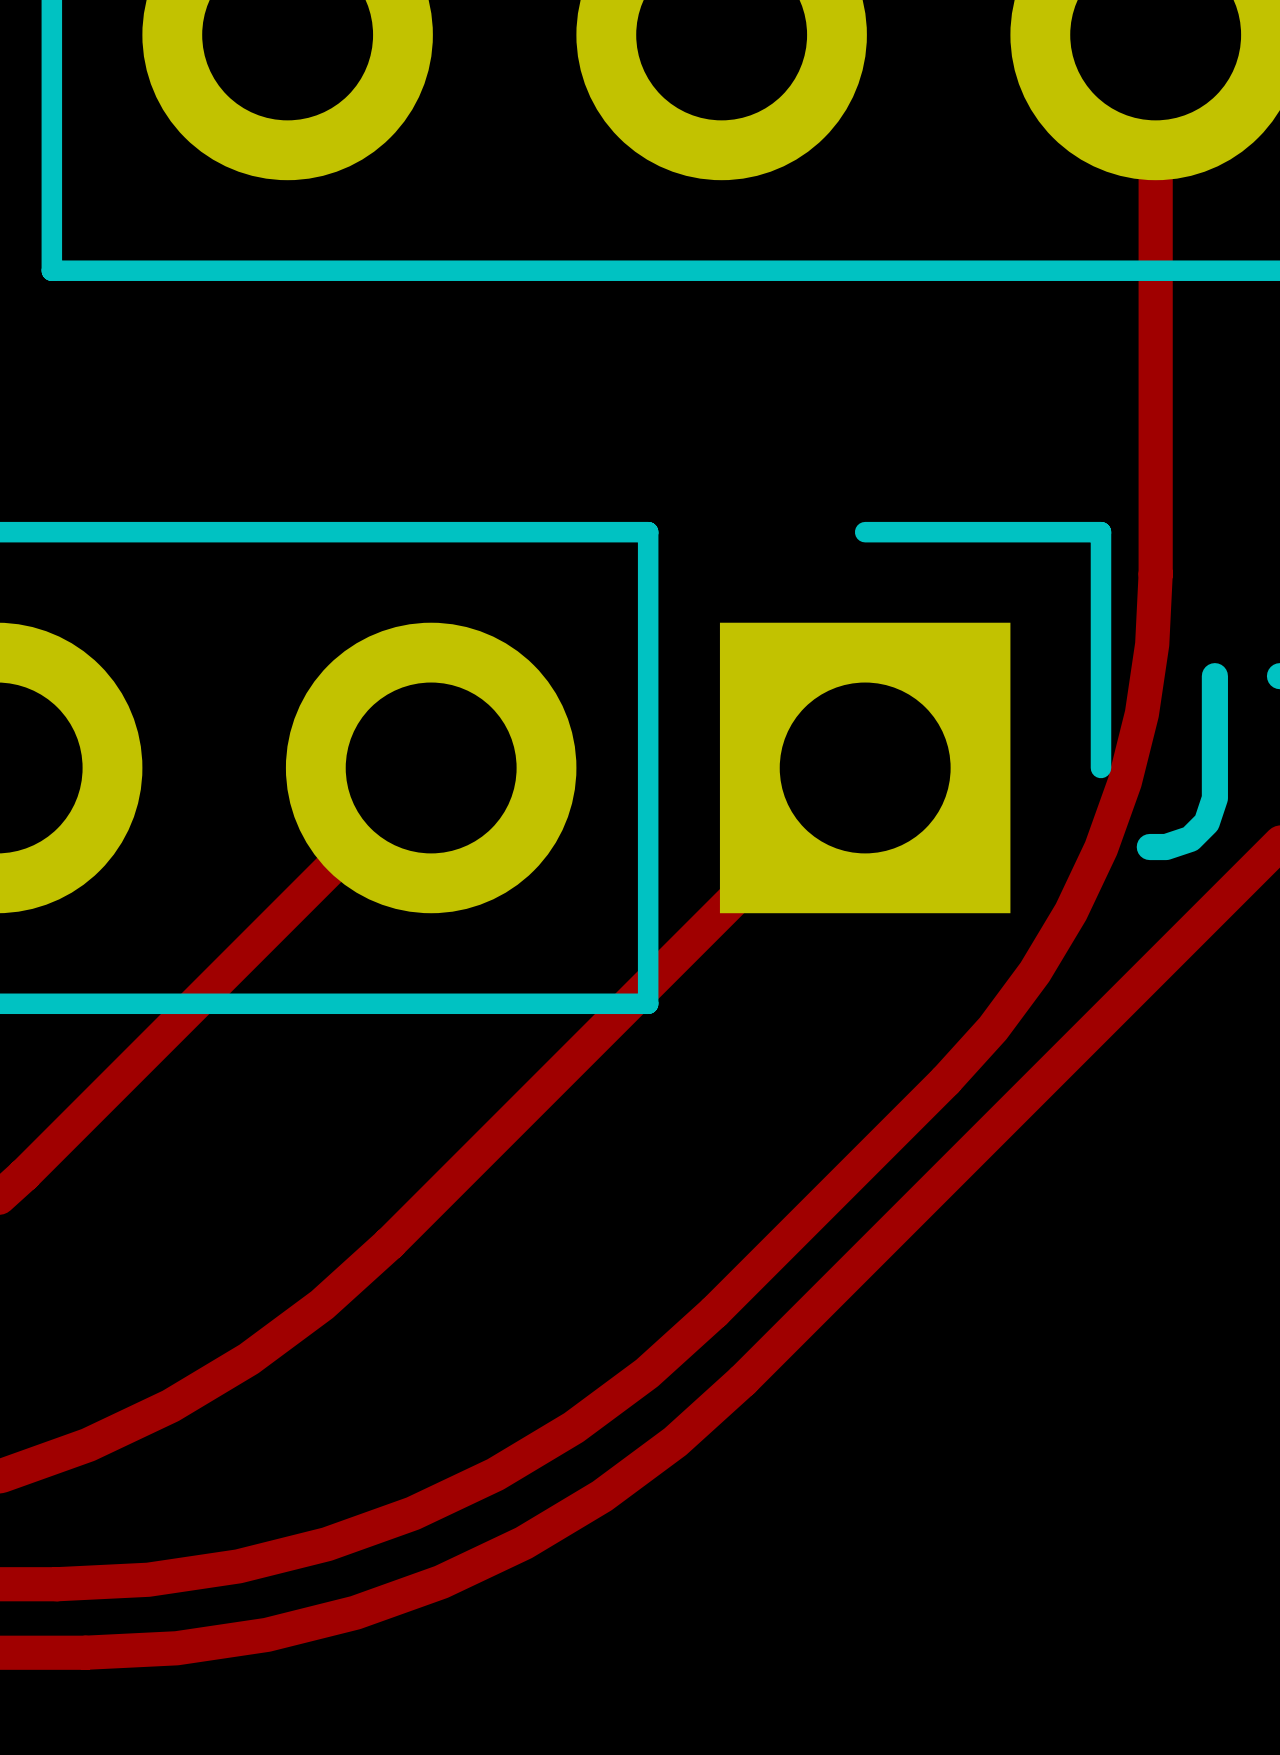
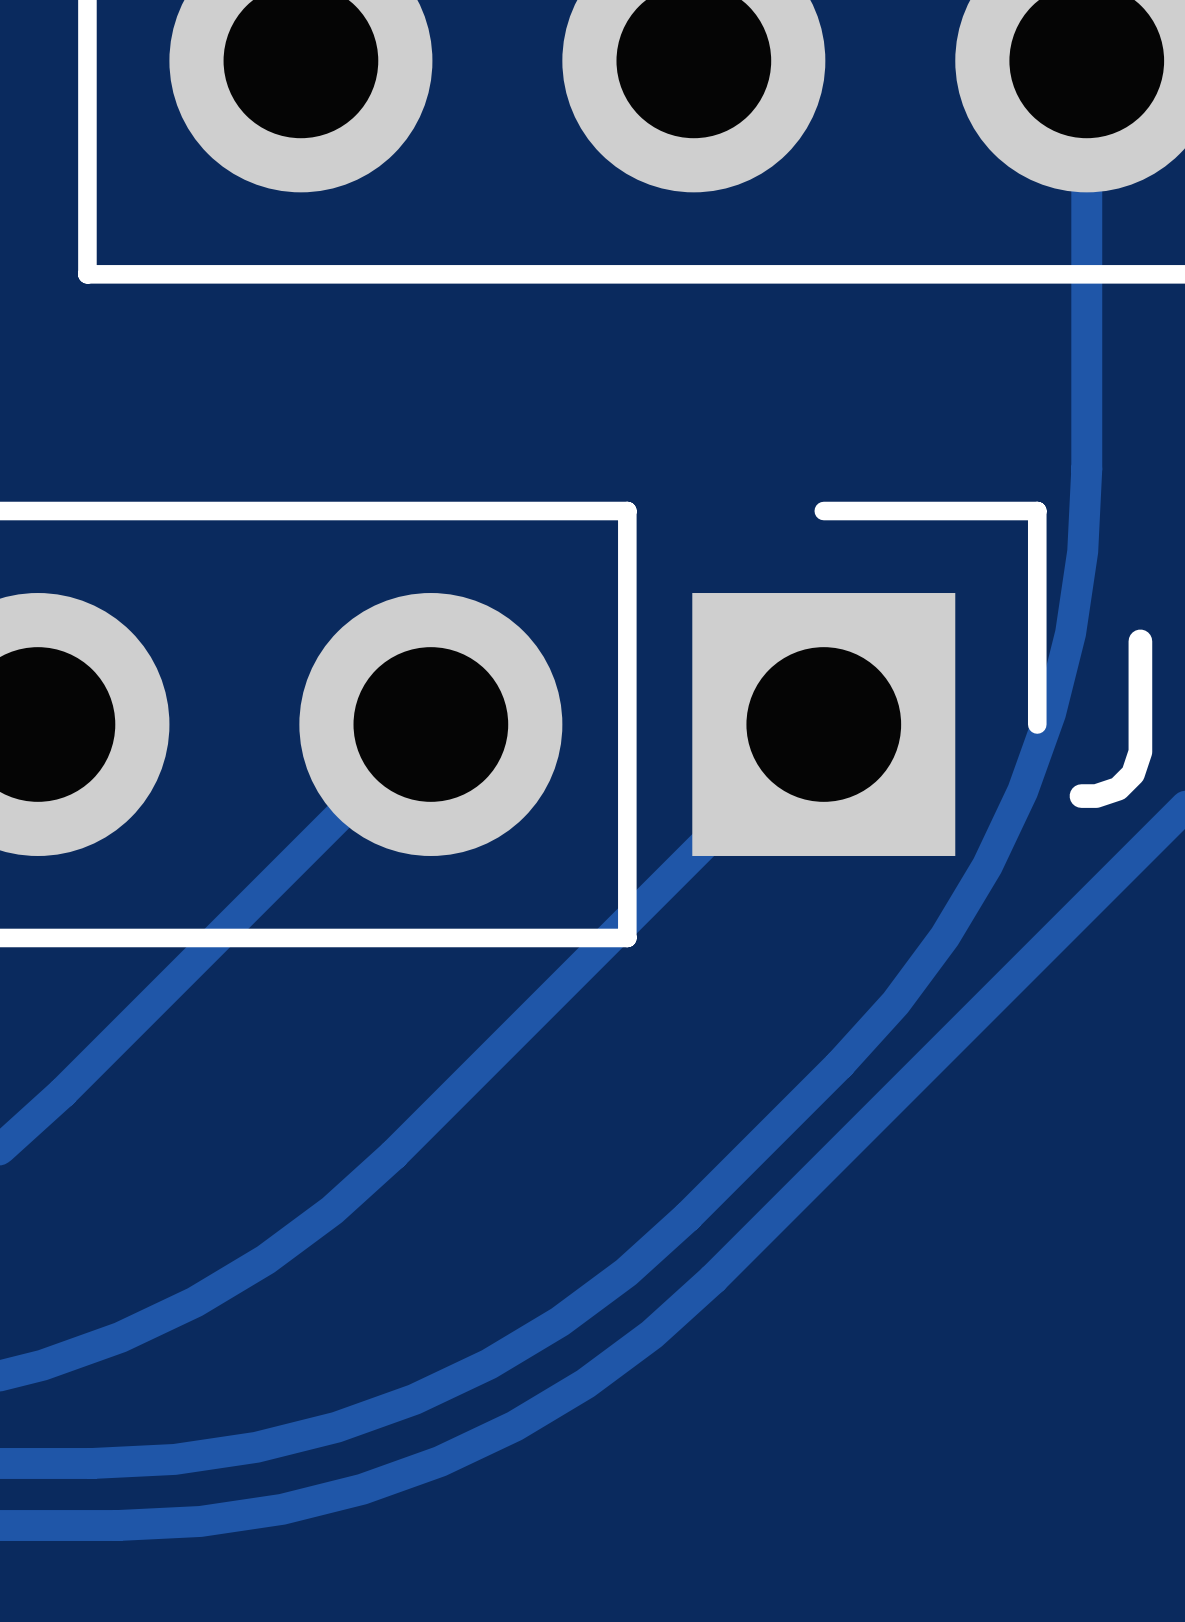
track: (1155, 485) (1155, 574) (1152, 644) (1141, 713) (1124, 782) (1101, 848) (1071, 911) (1034, 972) (993, 1028) (945, 1080) (883, 1143) -> (1086, 468) (1082, 551) (1070, 633) (1050, 713) (1022, 791) (987, 865) (944, 936) (895, 1002) (840, 1064)

